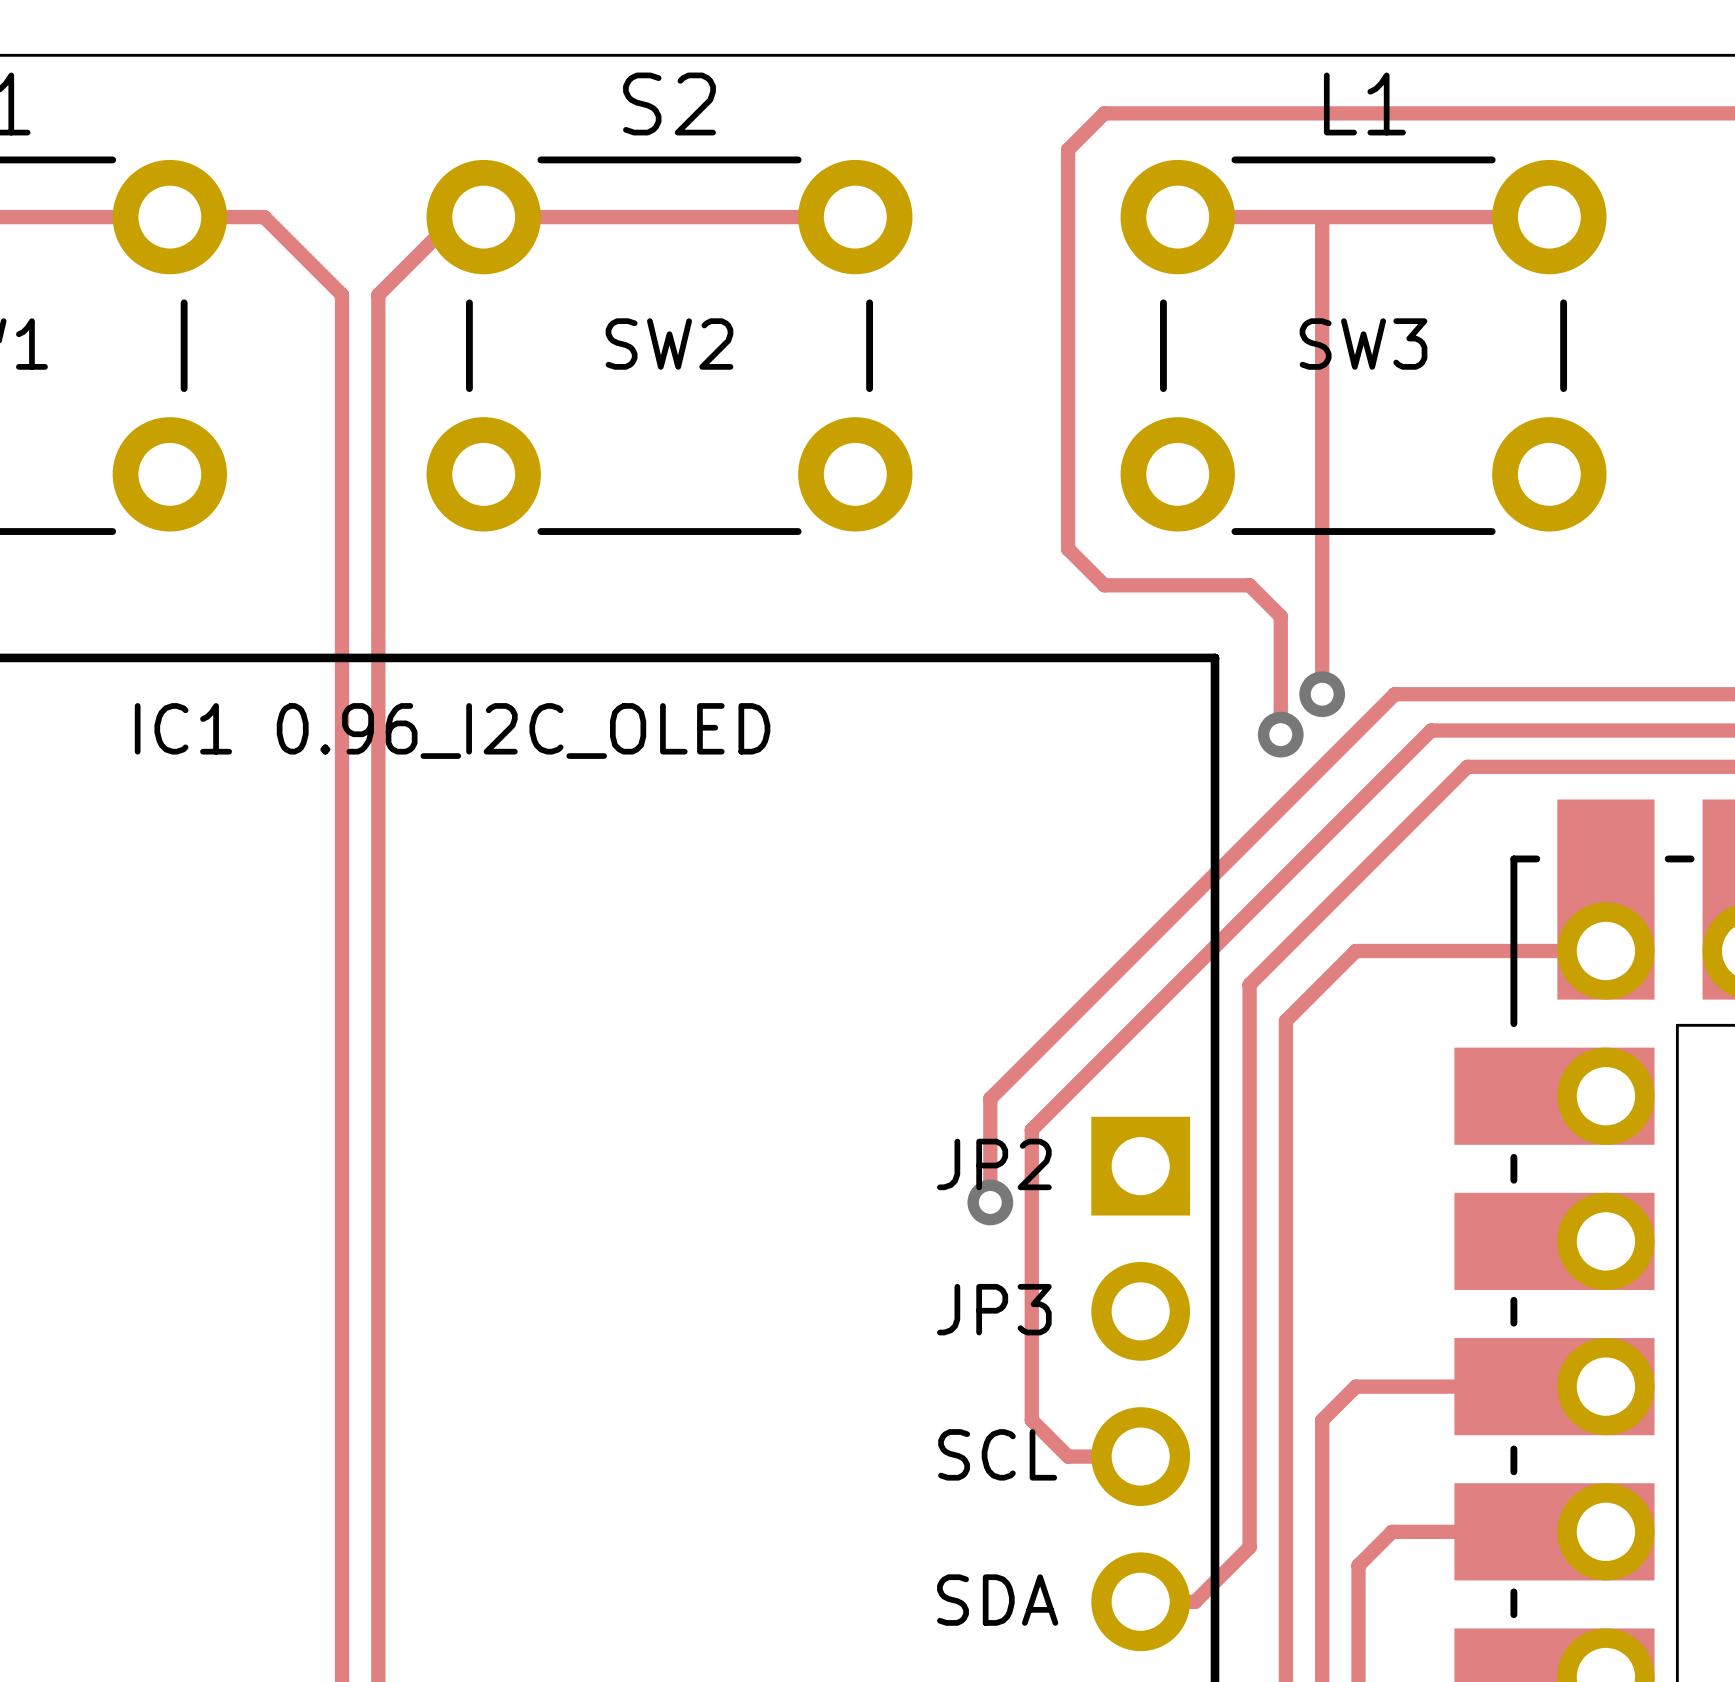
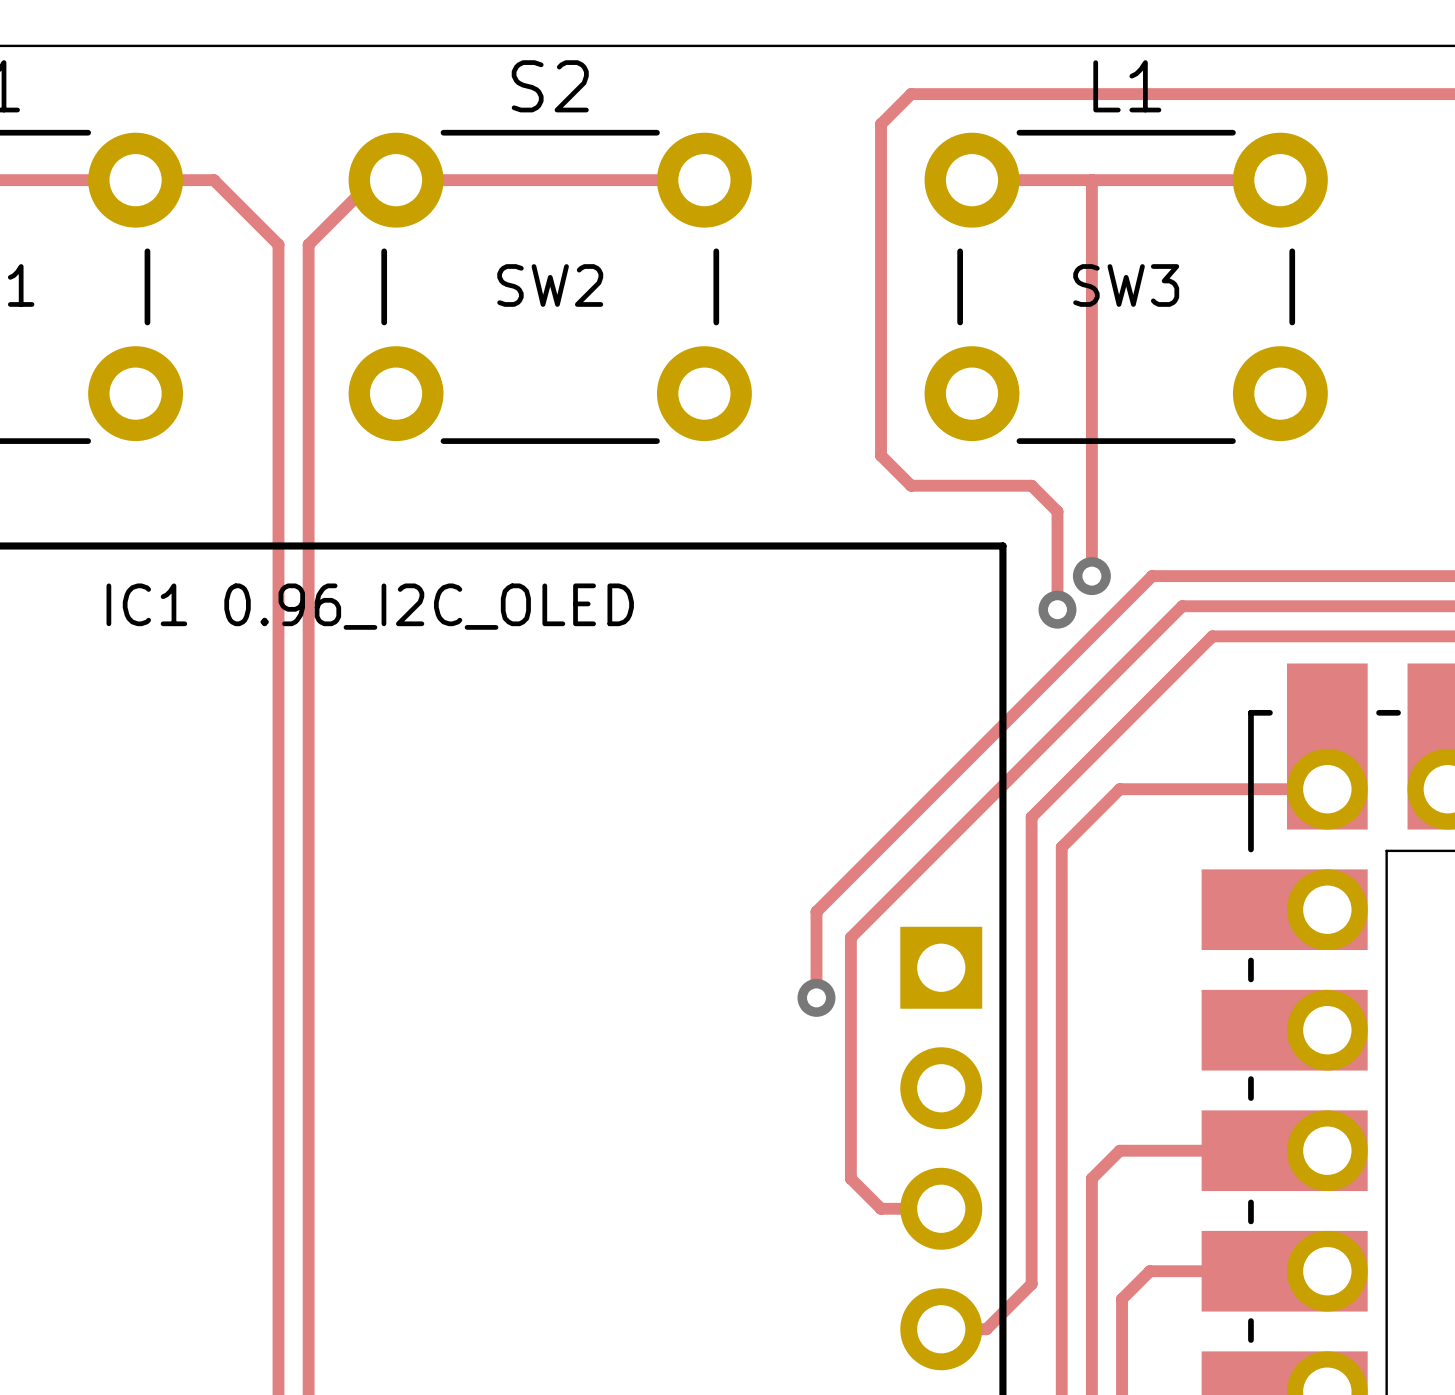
text: JP2 (994, 1164) -> none
text: JP3 (994, 1309) -> none
text: SCL (997, 1454) -> none
text: SDA (997, 1600) -> none

